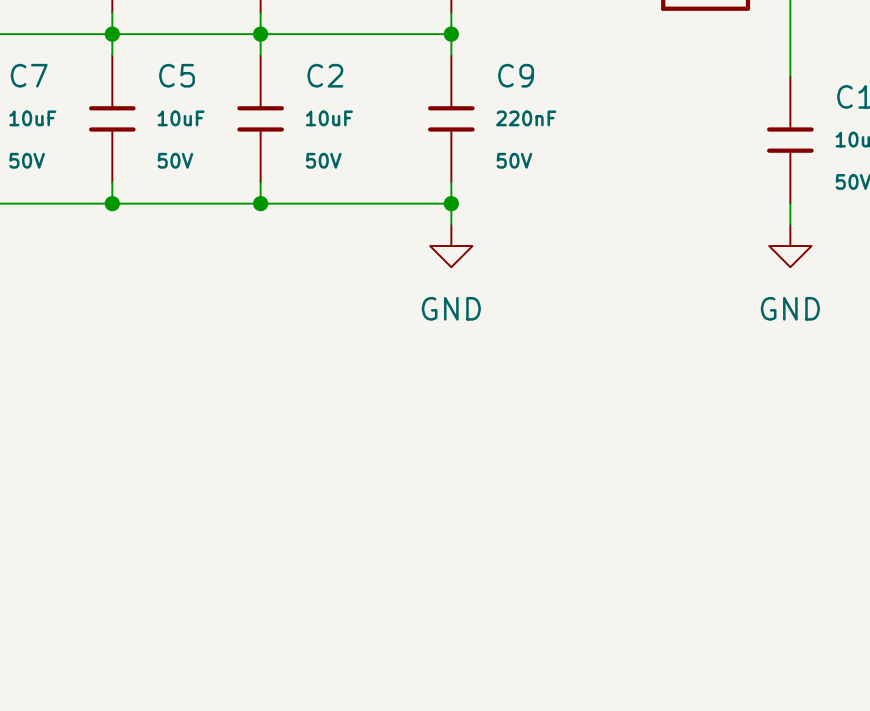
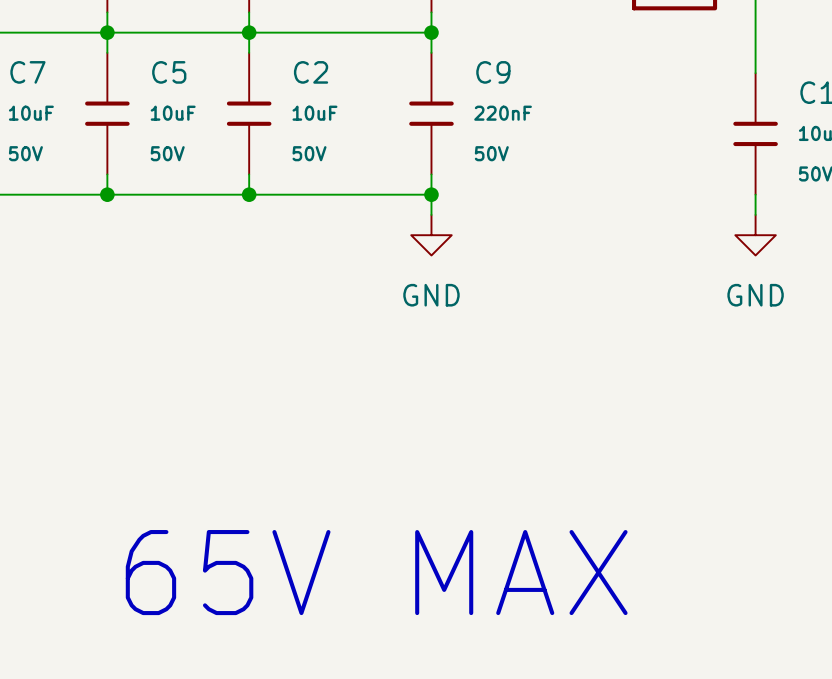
text: none -> 65V MAX (376, 572)

